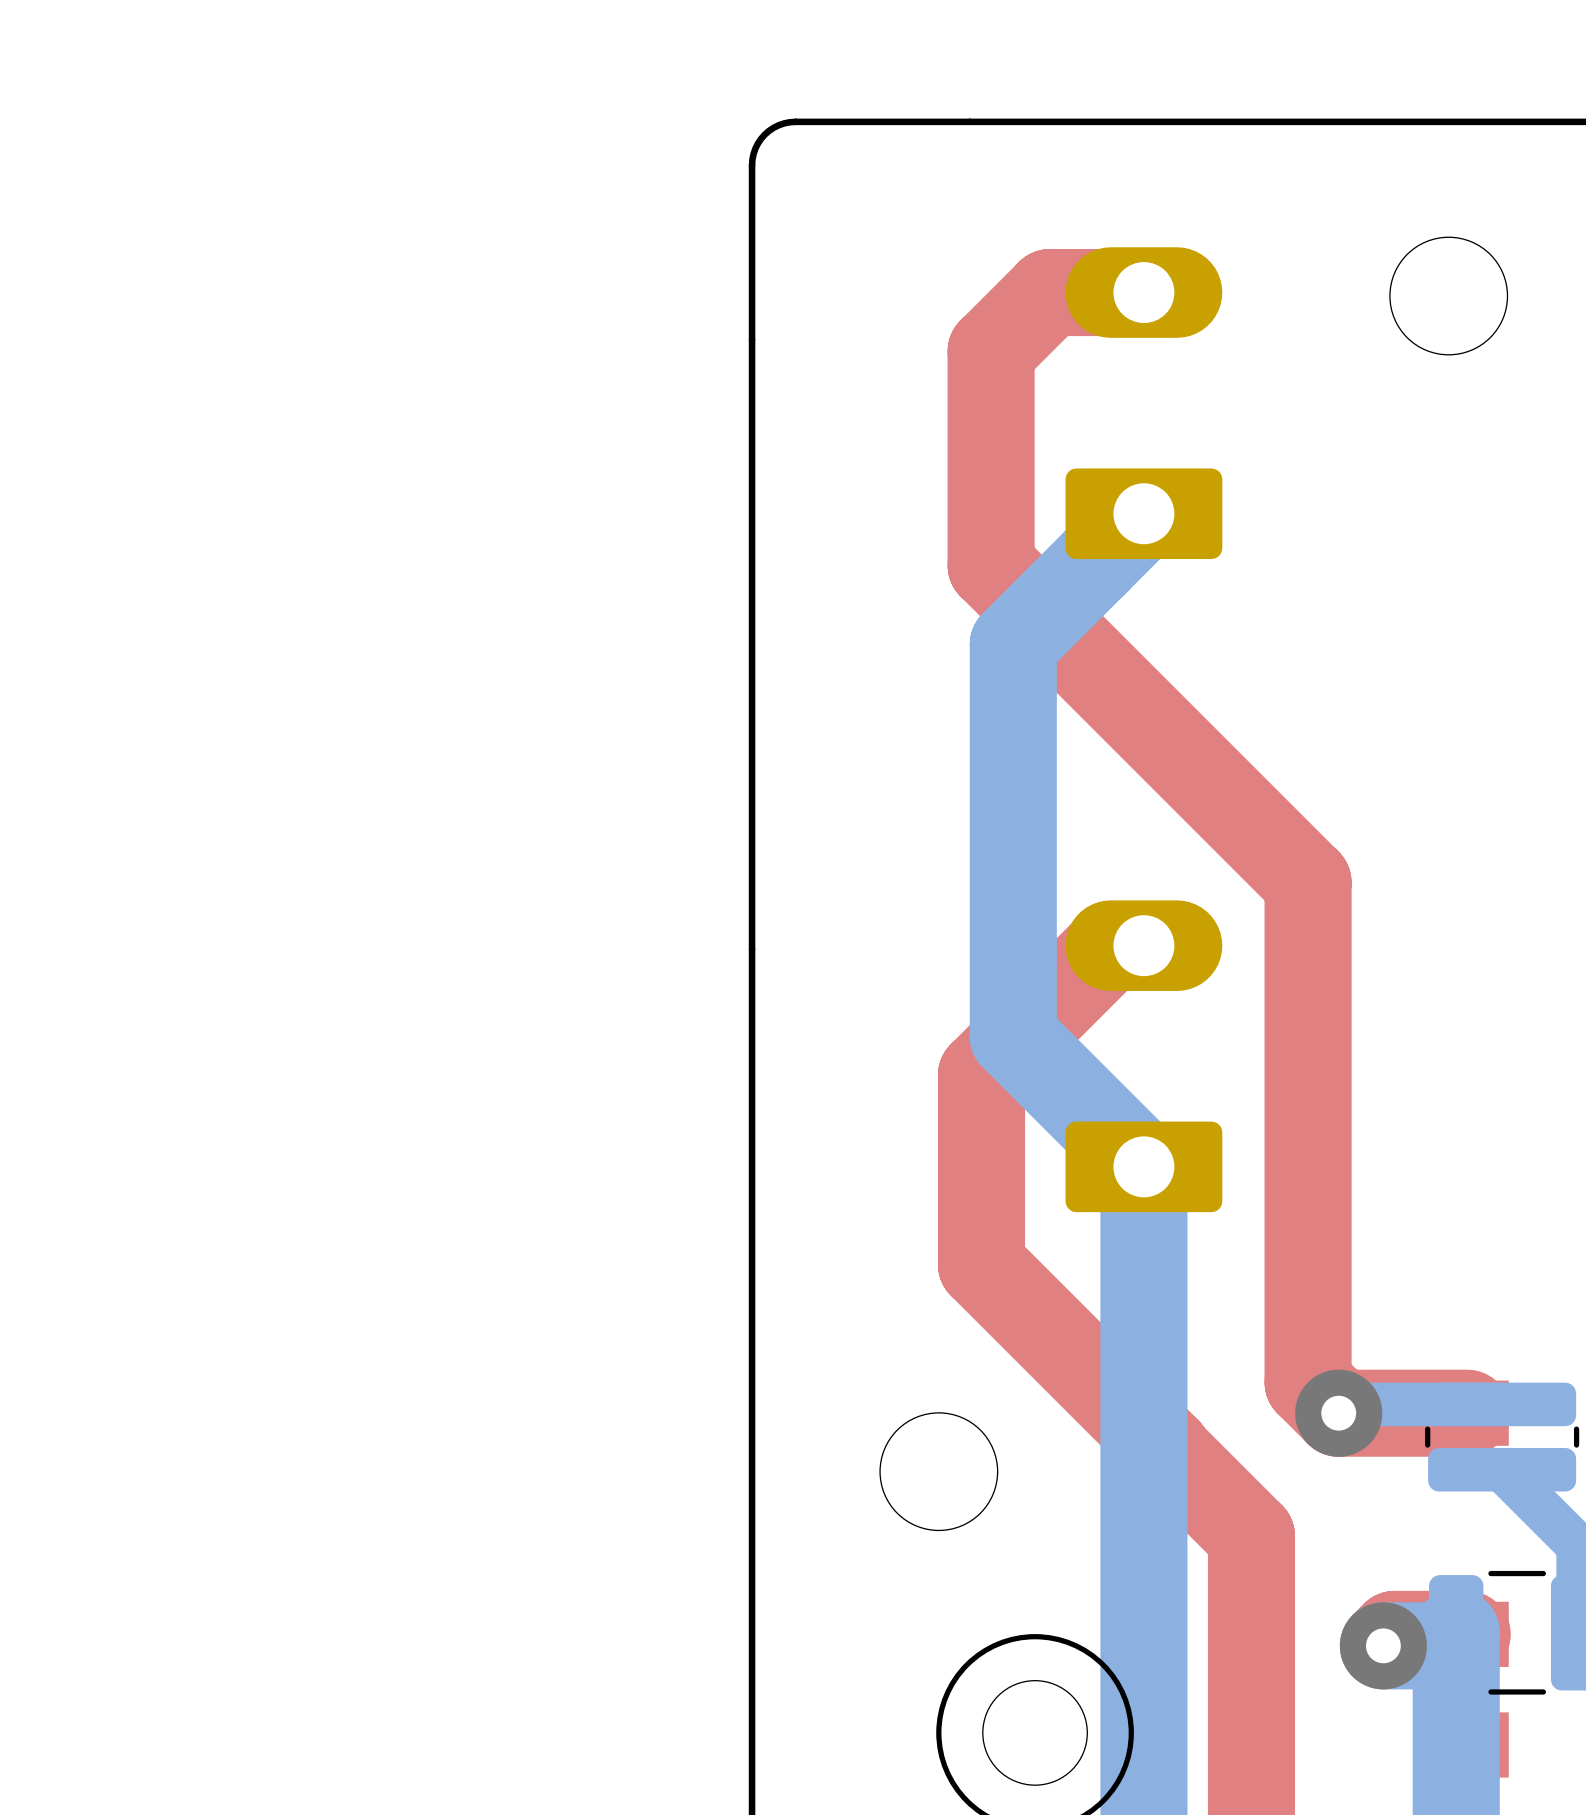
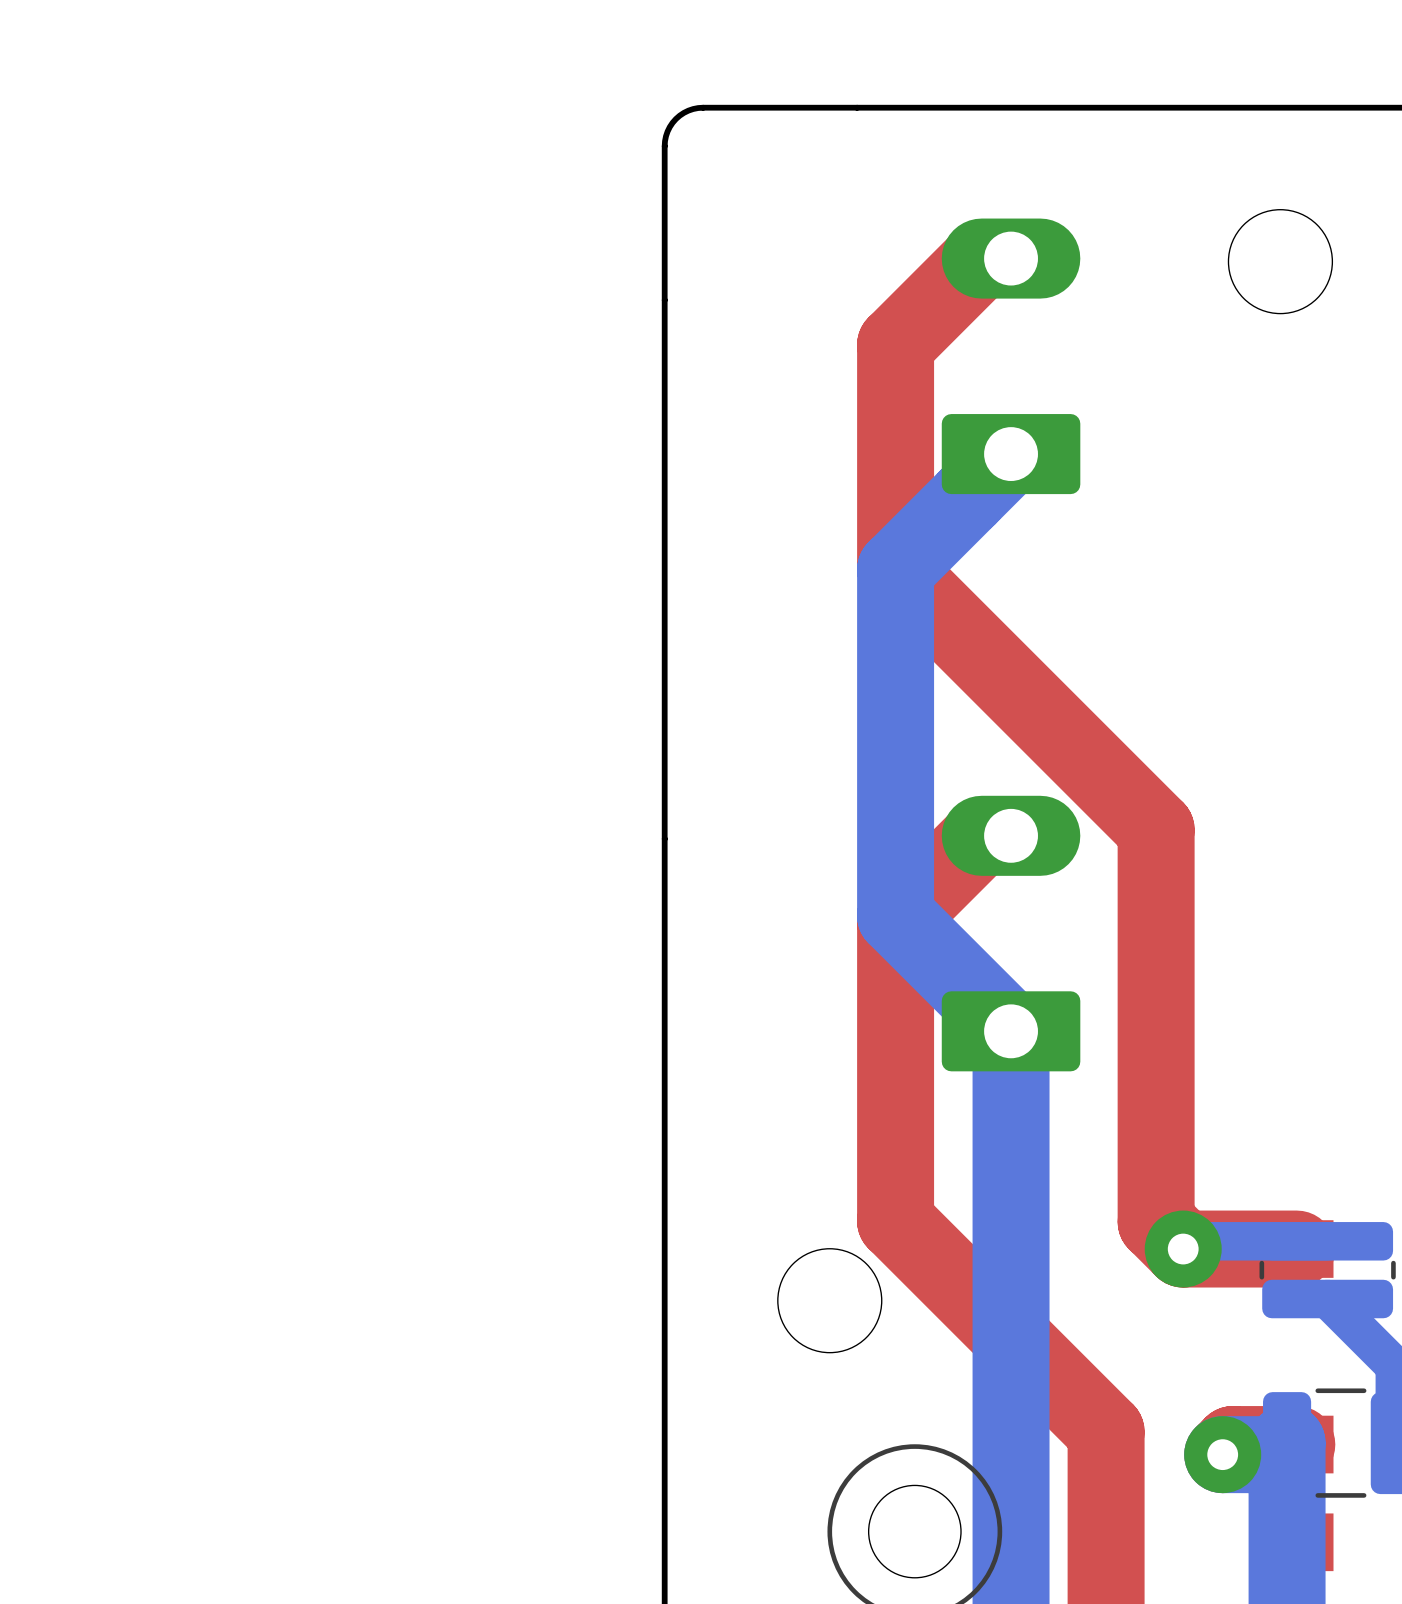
top track: (1110, 292) (1049, 292) (991, 351) (991, 565) (1308, 882) (1308, 938) -> (981, 258) (895, 344) (895, 569) (1156, 829)
top track: (1013, 1043) (981, 1075) (981, 1264) (1251, 1536) (1251, 1619) -> (895, 922) (895, 1221) (1106, 1431)

